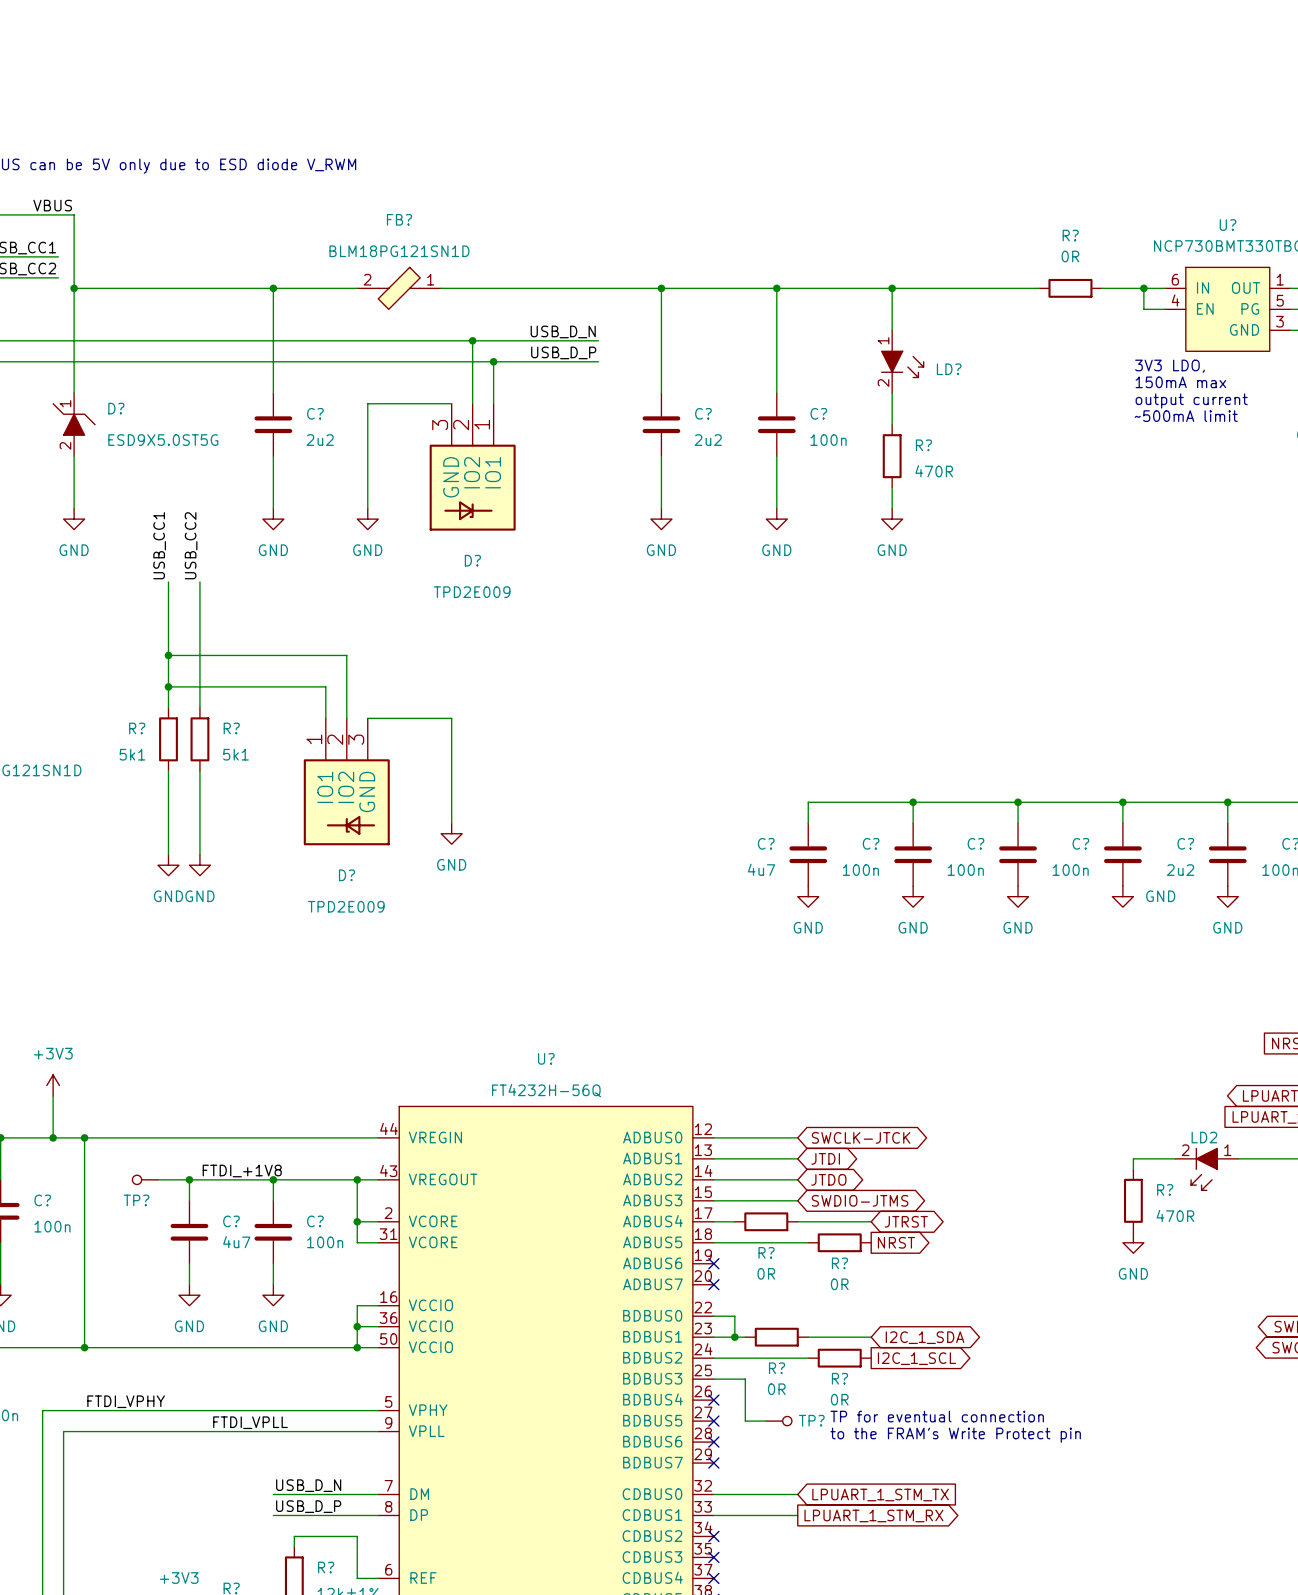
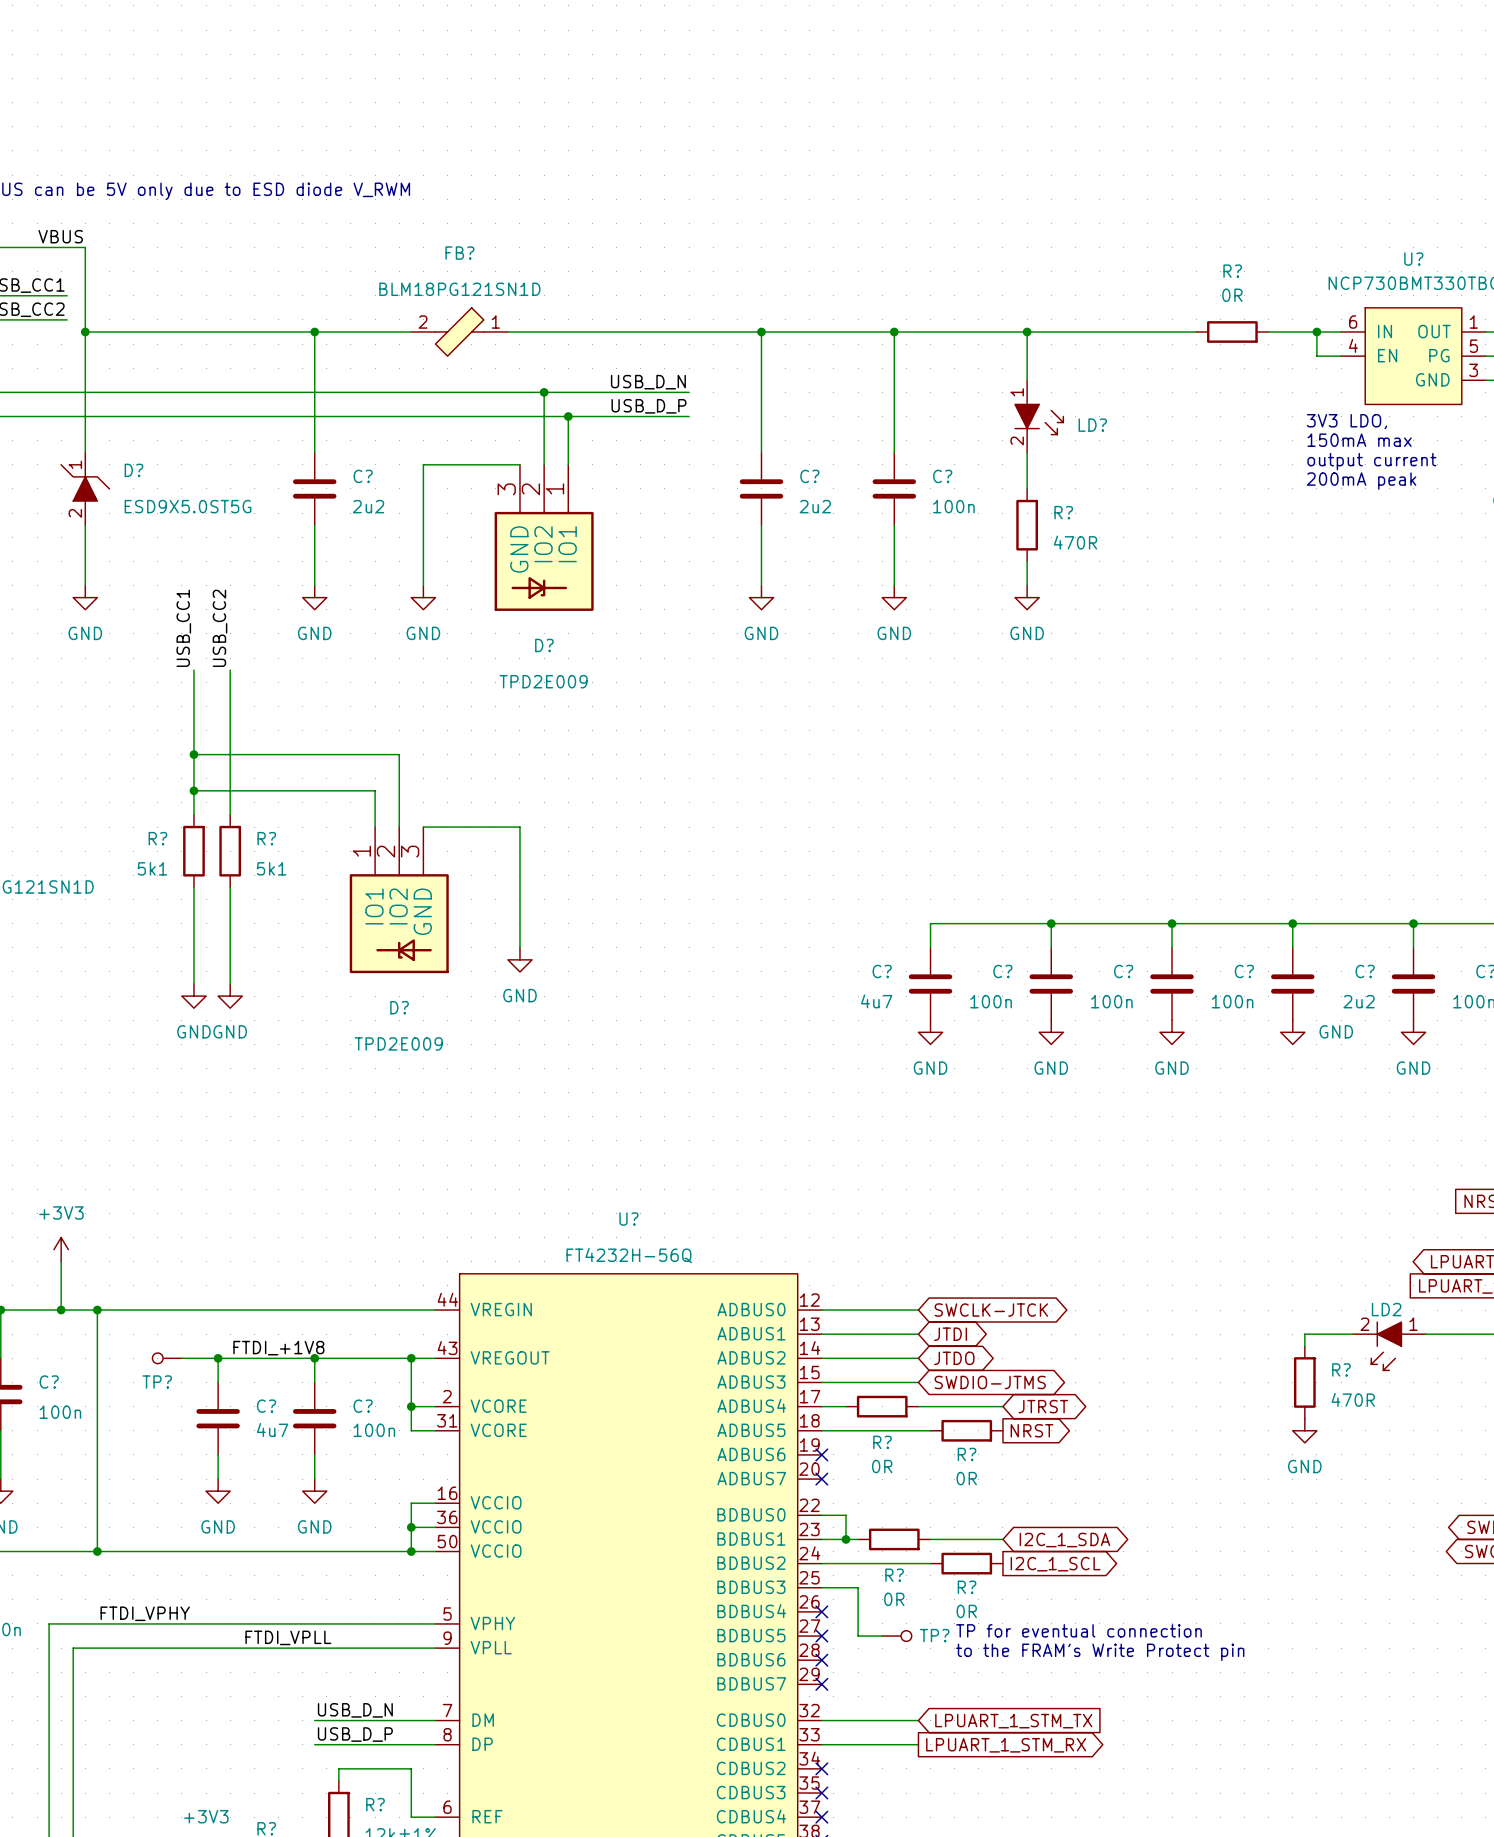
text: ~500mA limit (1186, 416) -> 200mA peak (1361, 481)

